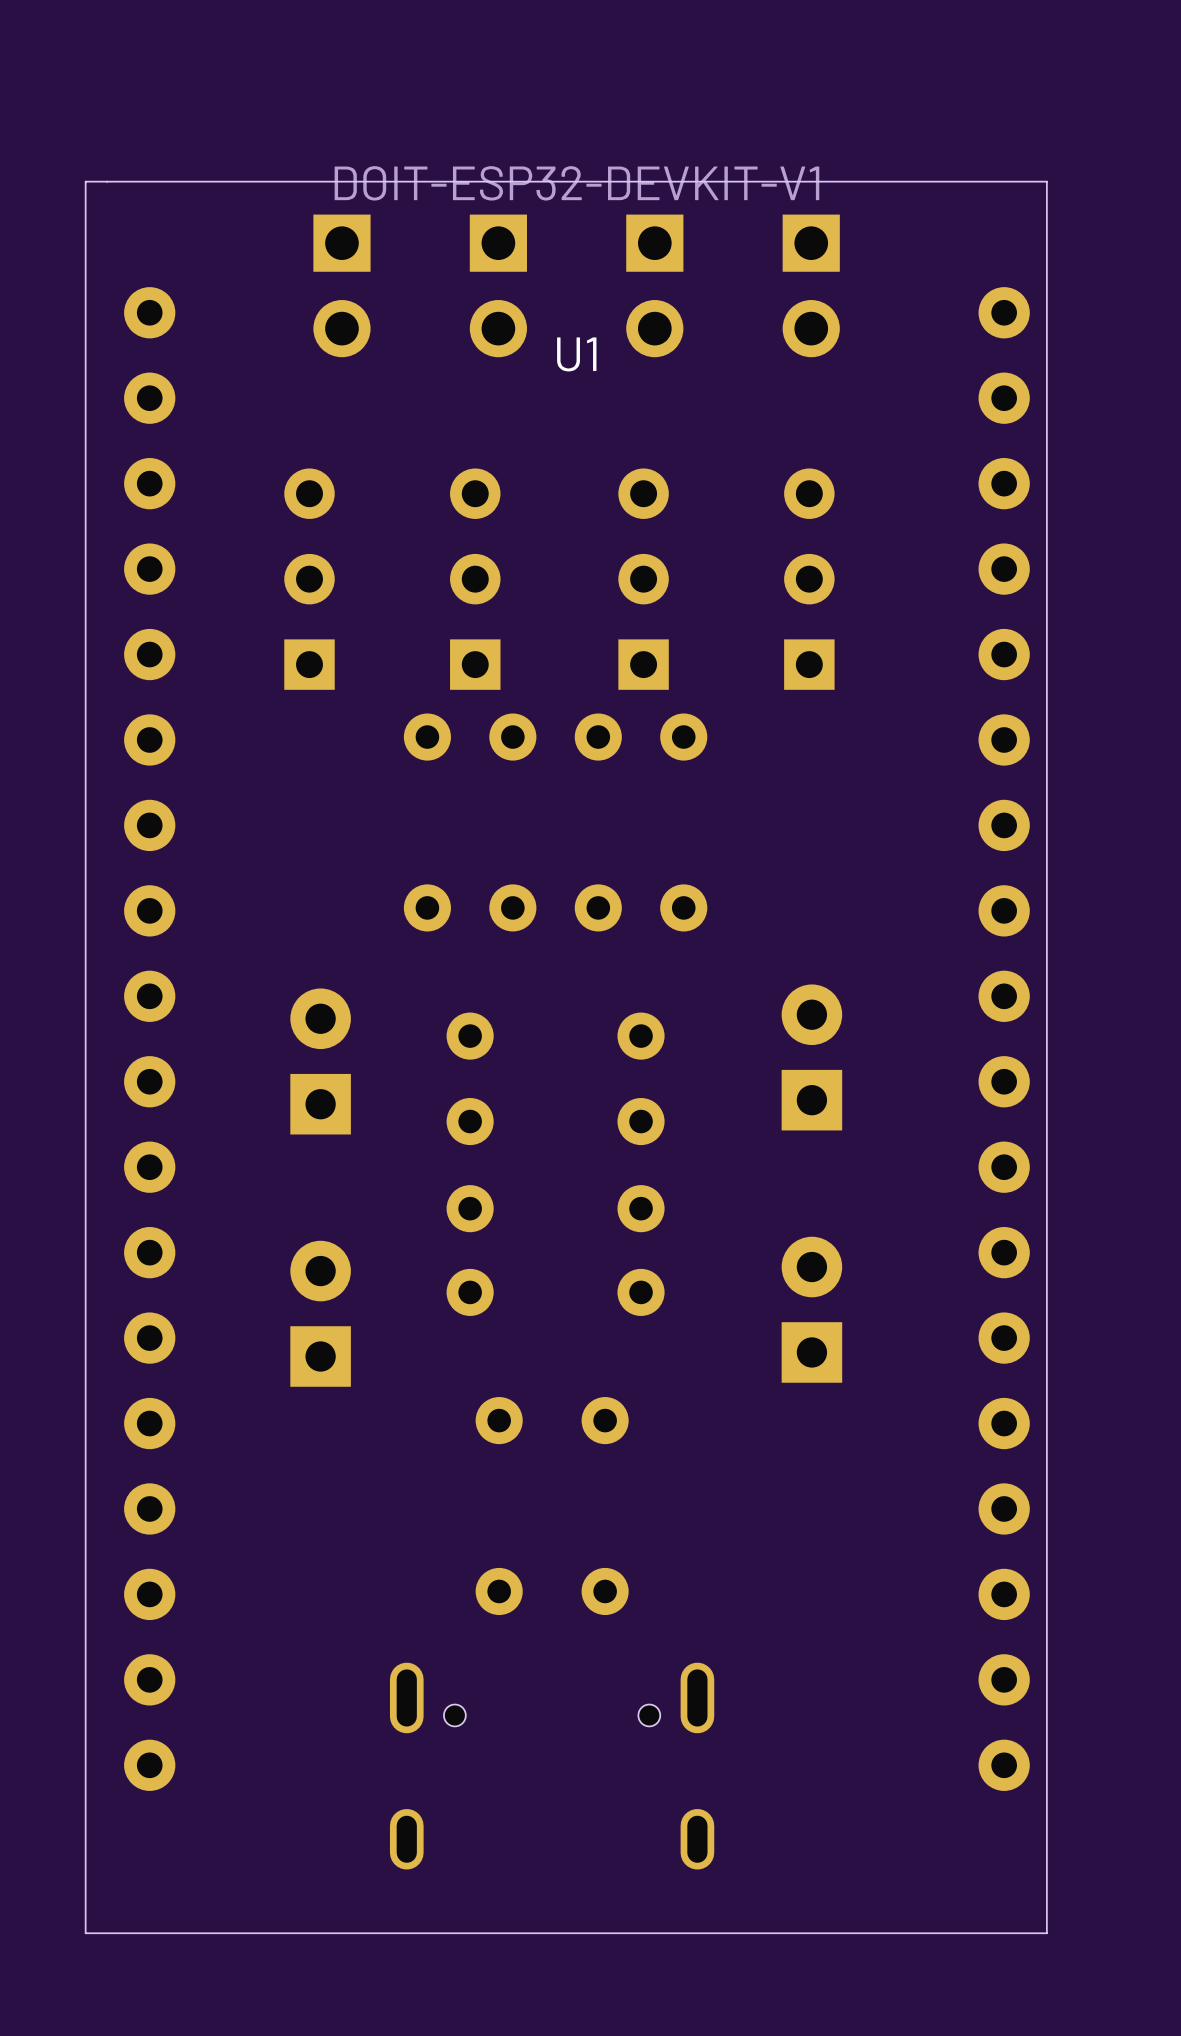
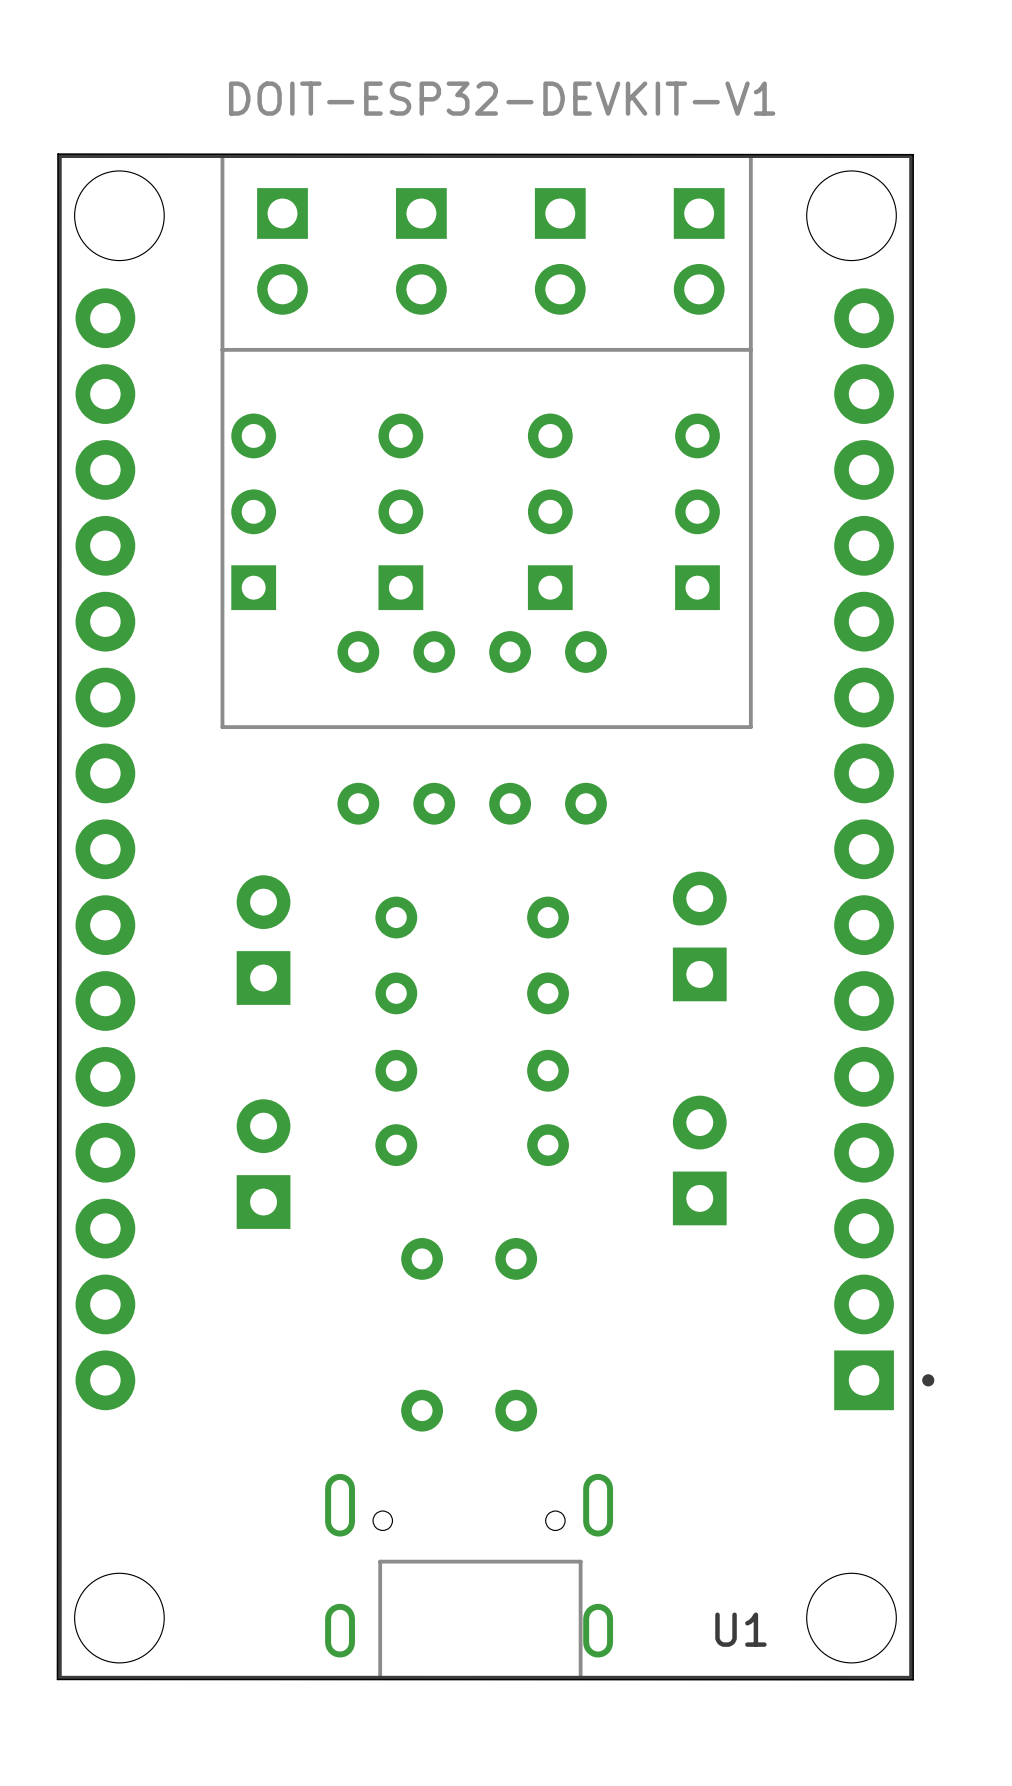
board edge: (1046, 181) (85, 181) (85, 1933) (1046, 1933) (1046, 181) -> (58, 154) (913, 154) (913, 1679) (57, 1679) (58, 154)
U1 footprint: [124, 287, 1030, 1791] -> [57, 154, 935, 1680]
U1 name position: U1 (576, 354) -> U1 (740, 1629)

